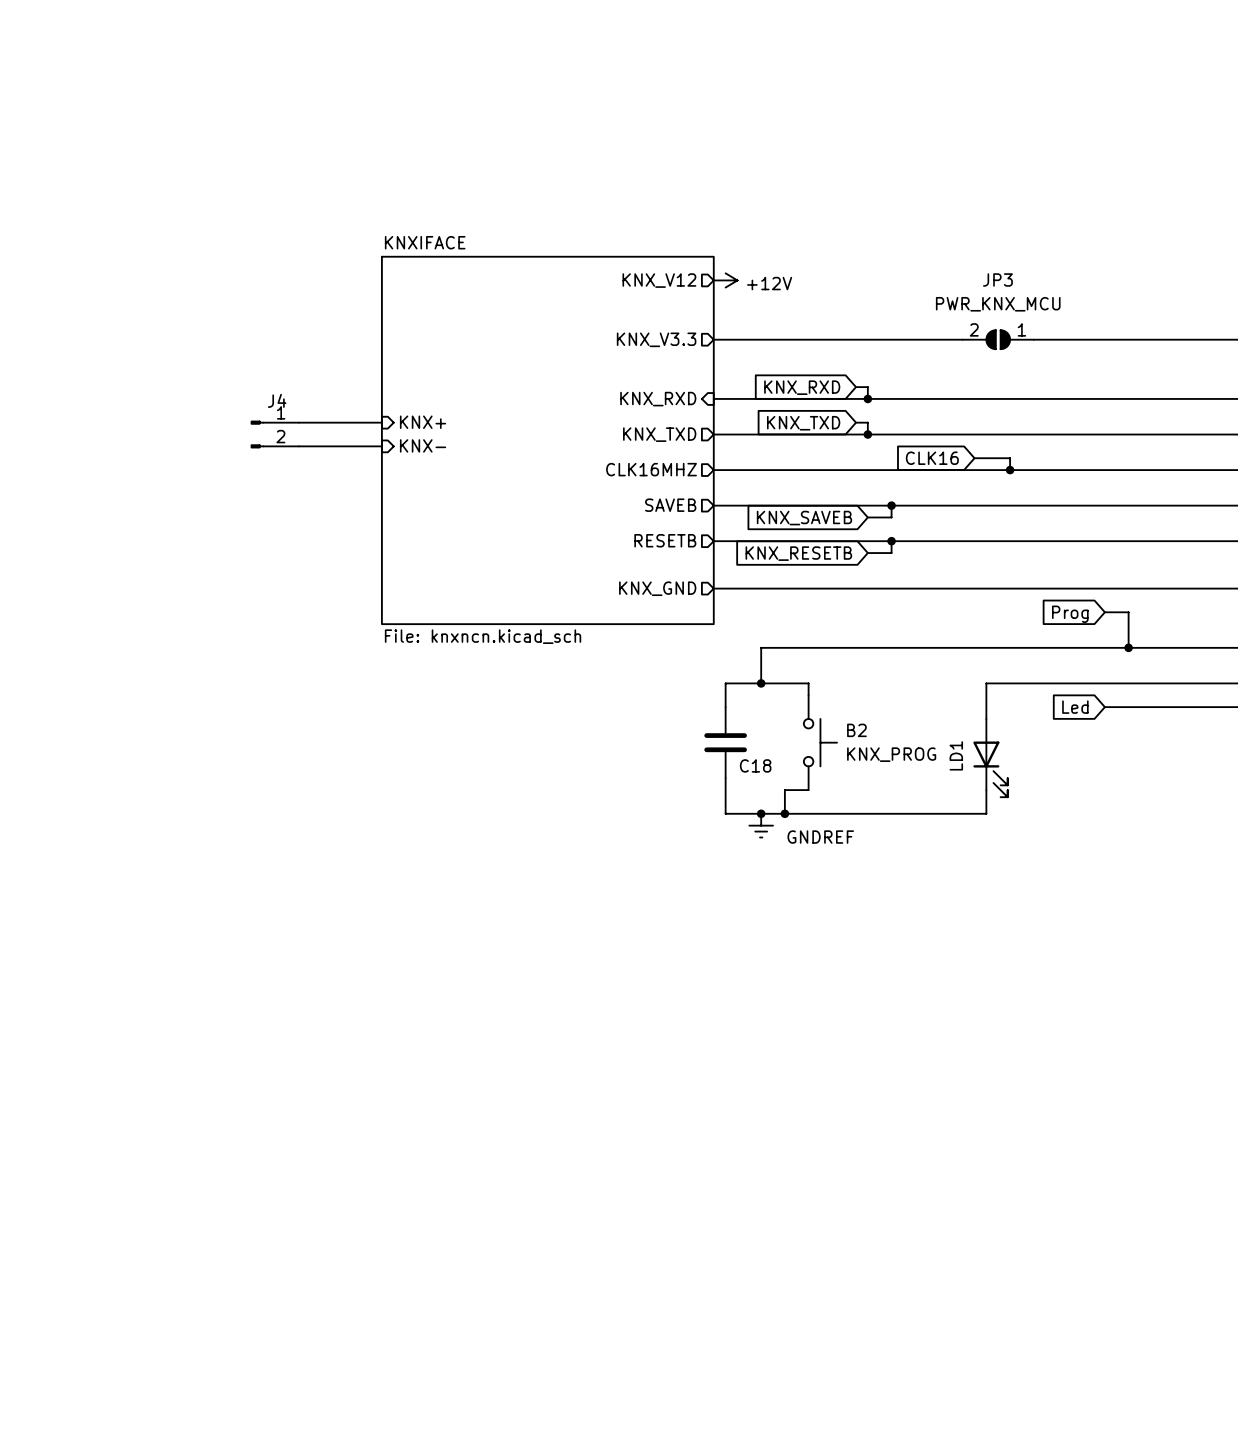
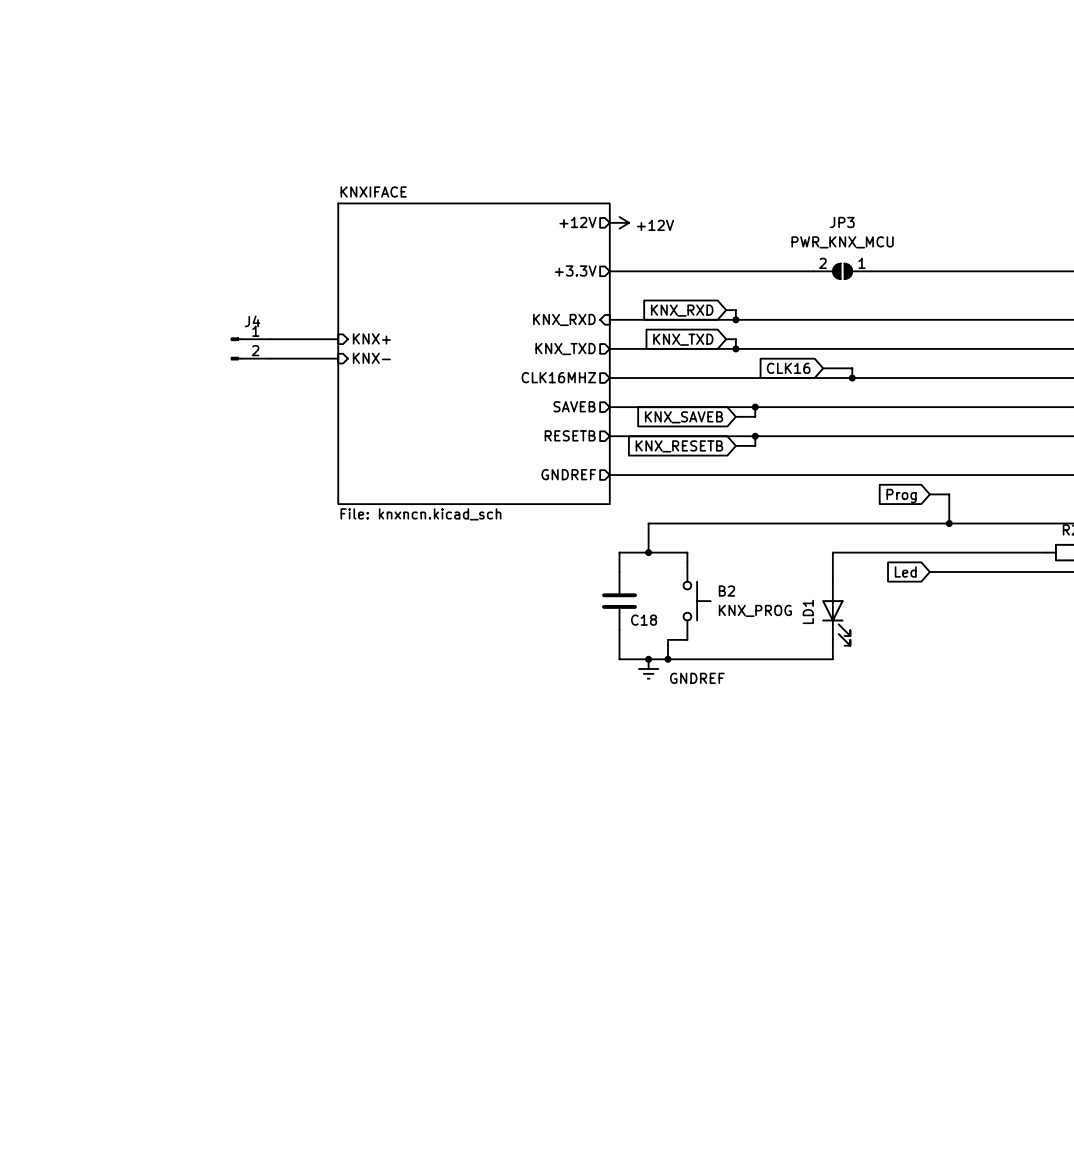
sheet pin: KNX_V12 (659, 280) -> +12V (578, 222)
sheet pin: KNX_V3.3 (656, 339) -> +3.3V (575, 270)
sheet pin: KNX_GND (657, 588) -> GNDREF (568, 474)

